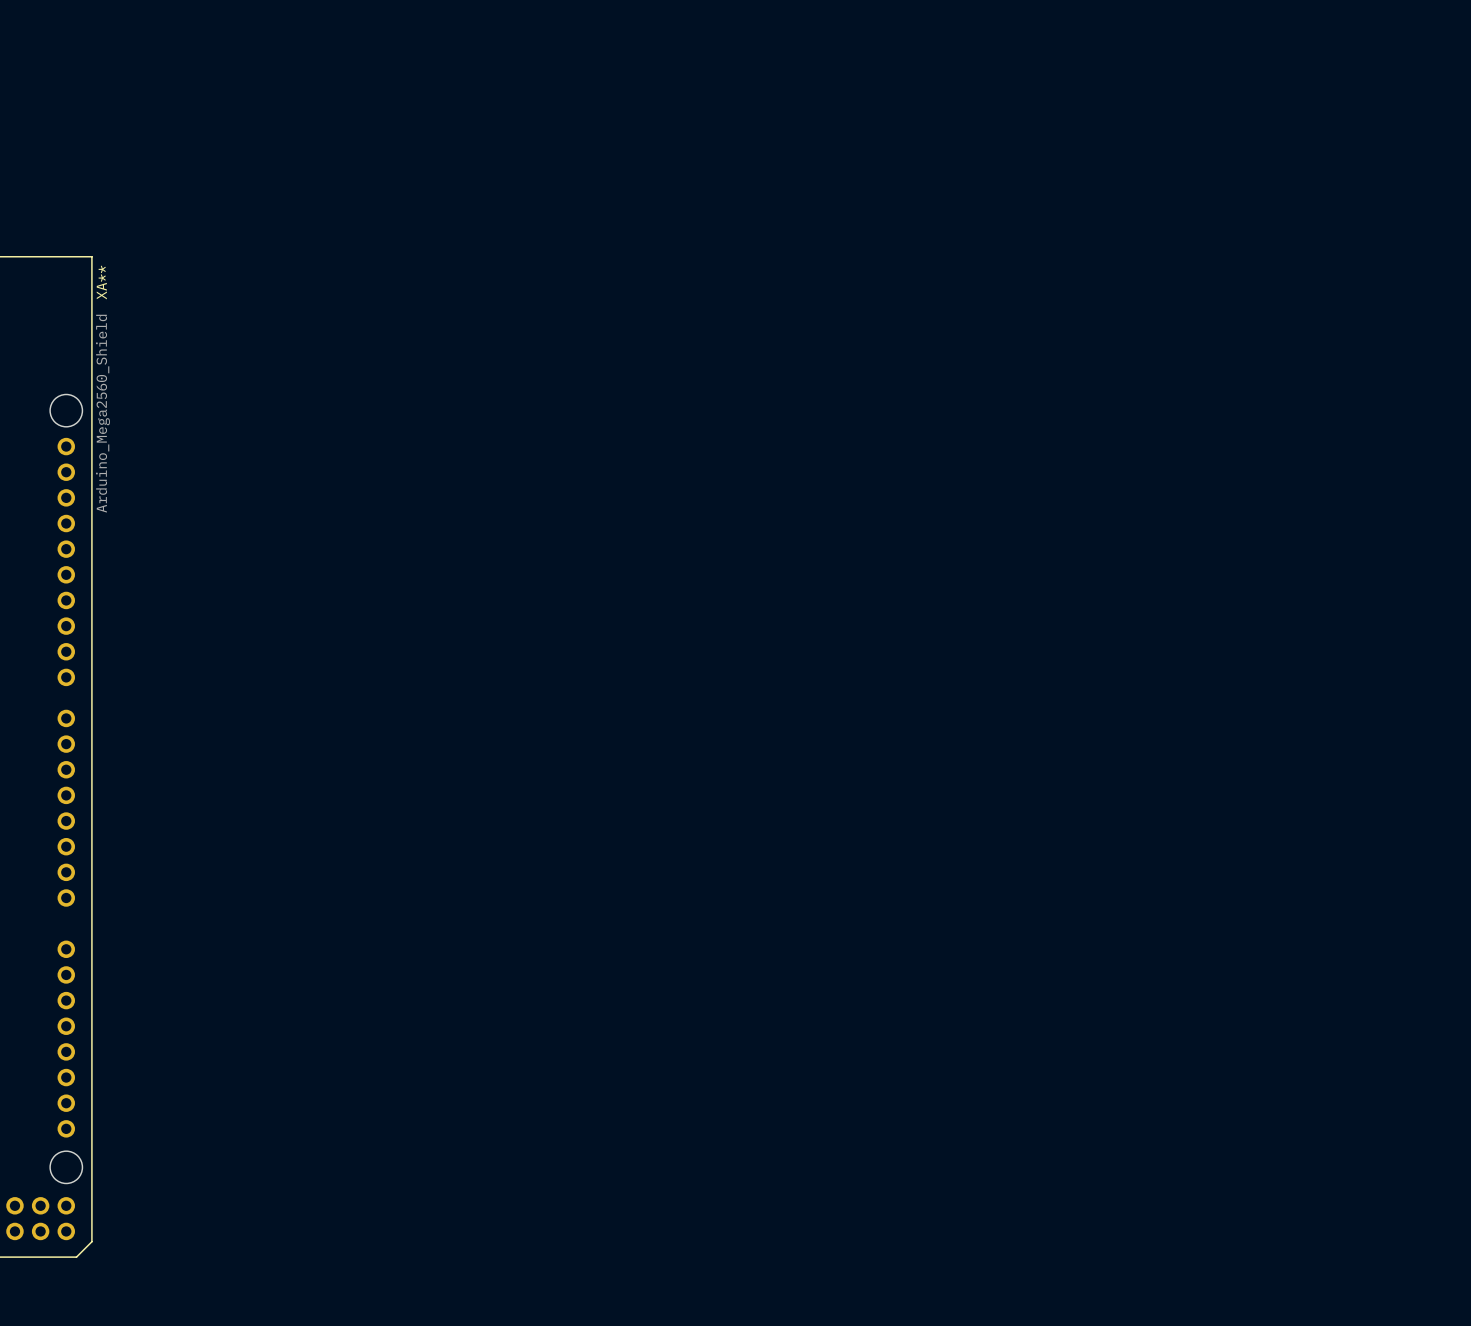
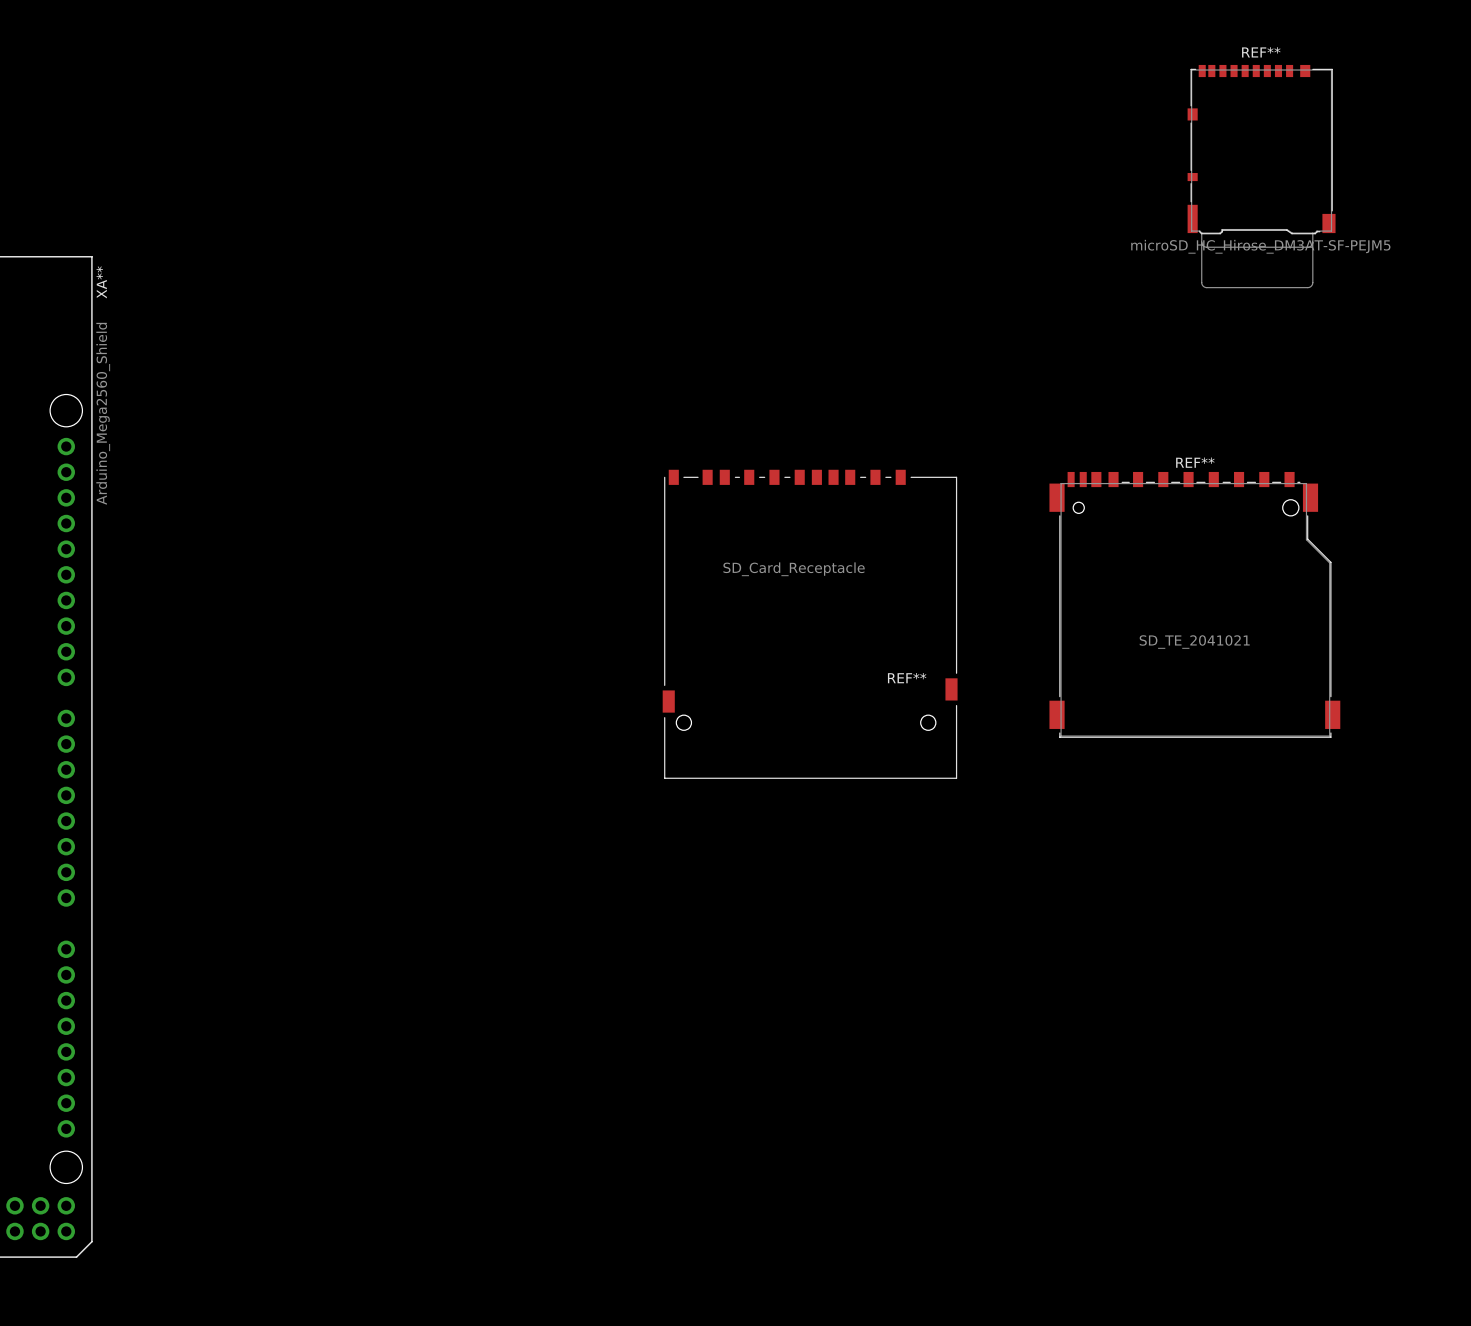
REF**: none -> microSD_HC_Hirose_DM3AT-SF-PEJM5 (1261, 176)
REF**: none -> SD_TE_2041021 (1194, 604)
REF**: none -> SD_Card_Receptacle (810, 624)

